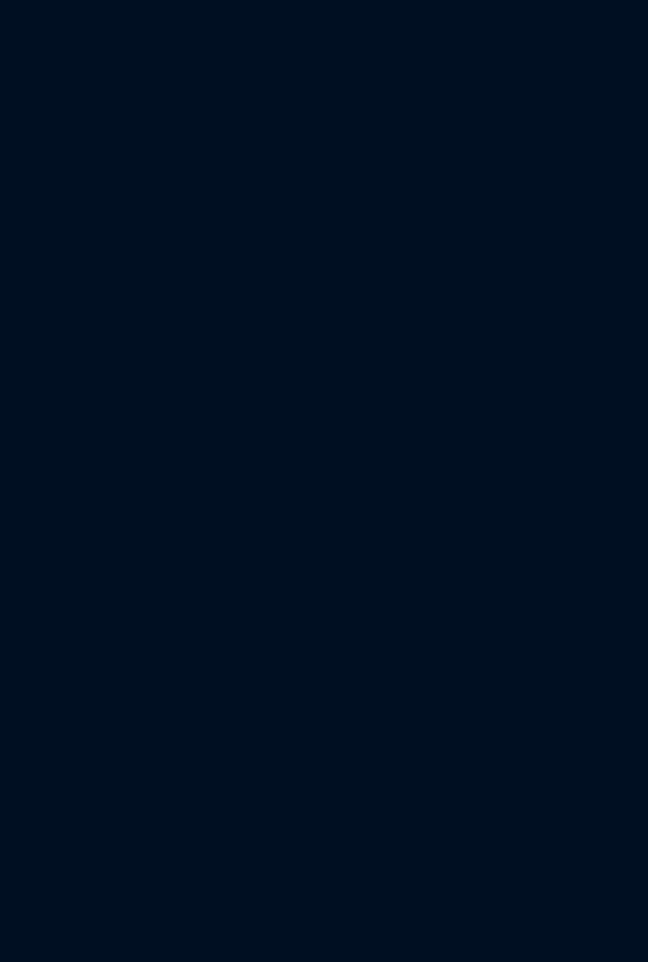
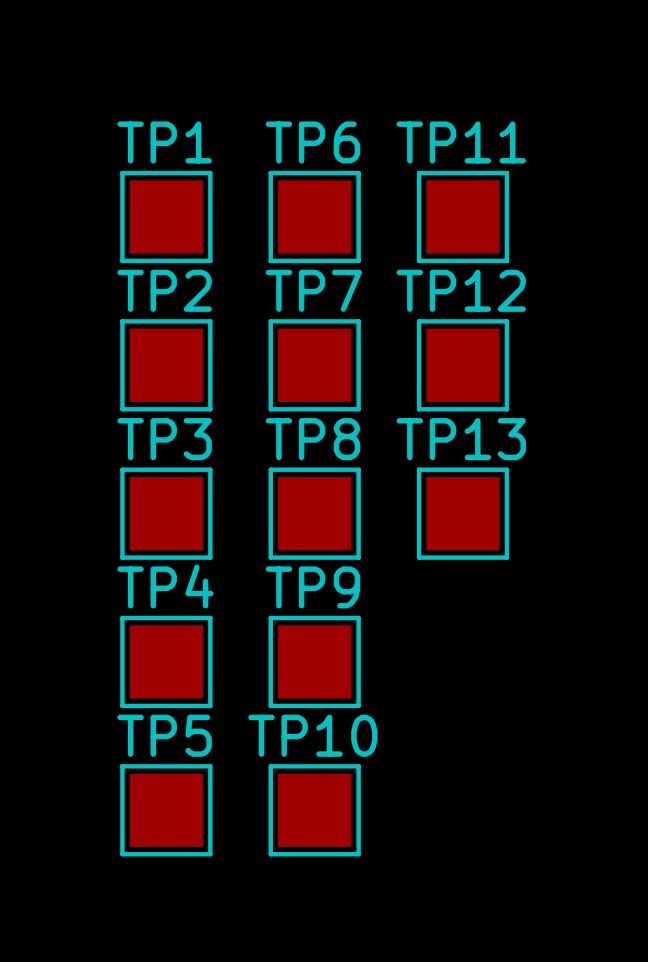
TP1: none -> (166, 217)
TP6: none -> (314, 217)
TP11: none -> (463, 217)
TP2: none -> (166, 365)
TP7: none -> (314, 365)
TP12: none -> (463, 365)
TP3: none -> (166, 513)
TP8: none -> (314, 513)
TP13: none -> (463, 513)
TP4: none -> (166, 661)
TP9: none -> (314, 661)
TP5: none -> (166, 810)
TP10: none -> (314, 810)

